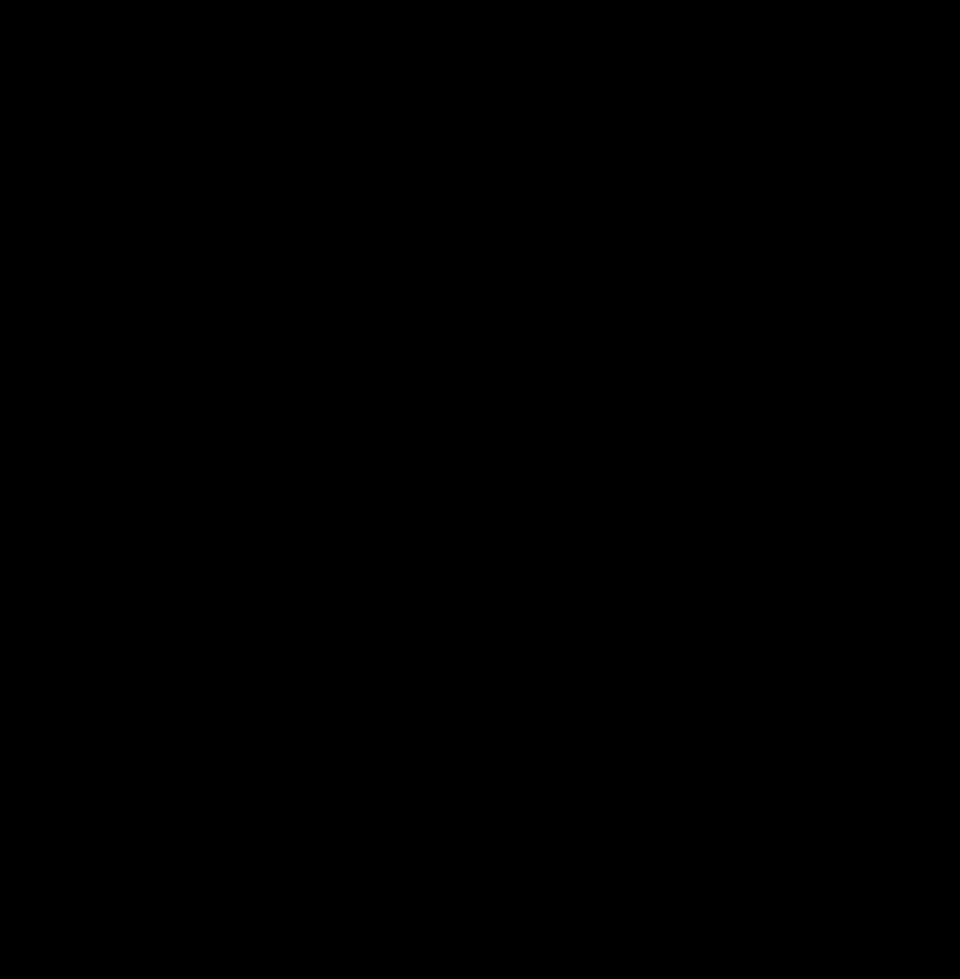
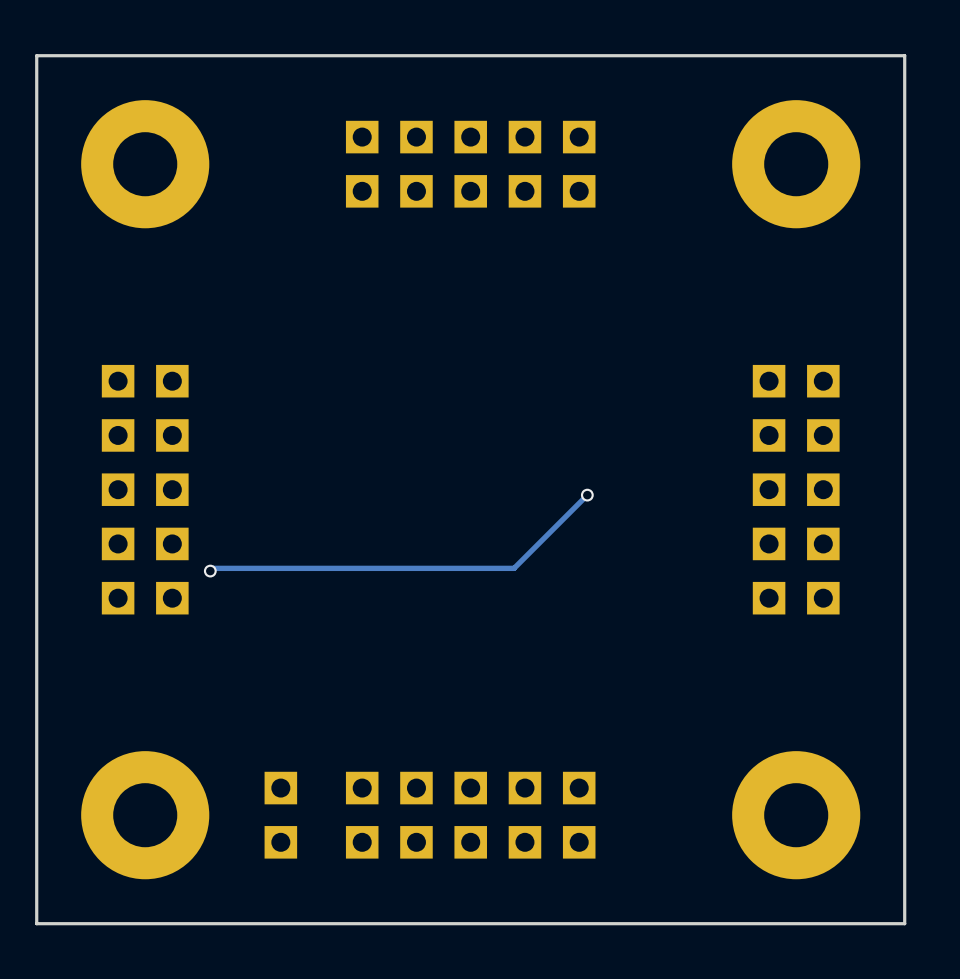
board edge: none -> (904, 55) (904, 923) (36, 923) (36, 55) (904, 55)
part: none -> (145, 164)
part: none -> (470, 164)
part: none -> (796, 164)
part: none -> (145, 489)
part: none -> (796, 489)
track: none -> (587, 495) (514, 568) (213, 568) (210, 571)
via: none -> (587, 495)
via: none -> (210, 571)
part: none -> (145, 815)
part: none -> (280, 815)
part: none -> (470, 815)
part: none -> (796, 815)

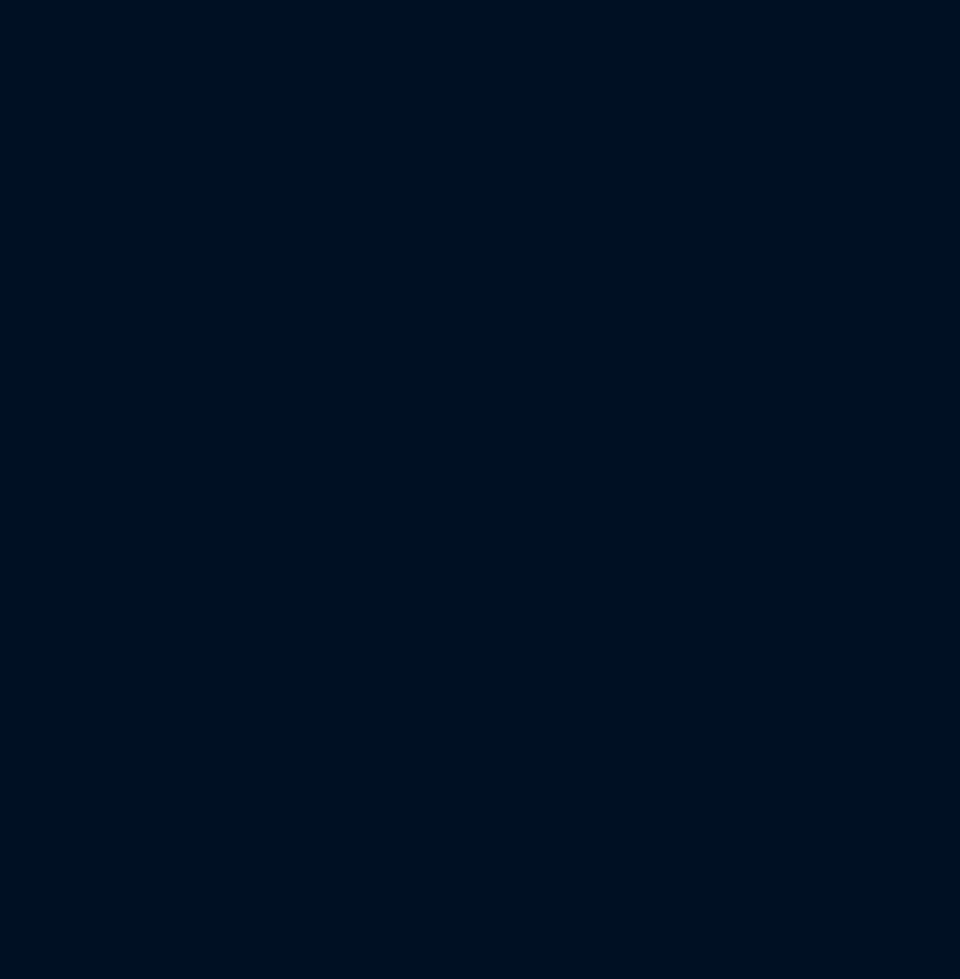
board edge: (904, 55) (904, 923) (36, 923) (36, 55) (904, 55) -> none
part: (145, 164) -> none
part: (470, 164) -> none
part: (796, 164) -> none
part: (145, 489) -> none
part: (796, 489) -> none
track: (587, 495) (514, 568) (213, 568) (210, 571) -> none
via: (587, 495) -> none
via: (210, 571) -> none
part: (145, 815) -> none
part: (280, 815) -> none
part: (470, 815) -> none
part: (796, 815) -> none

